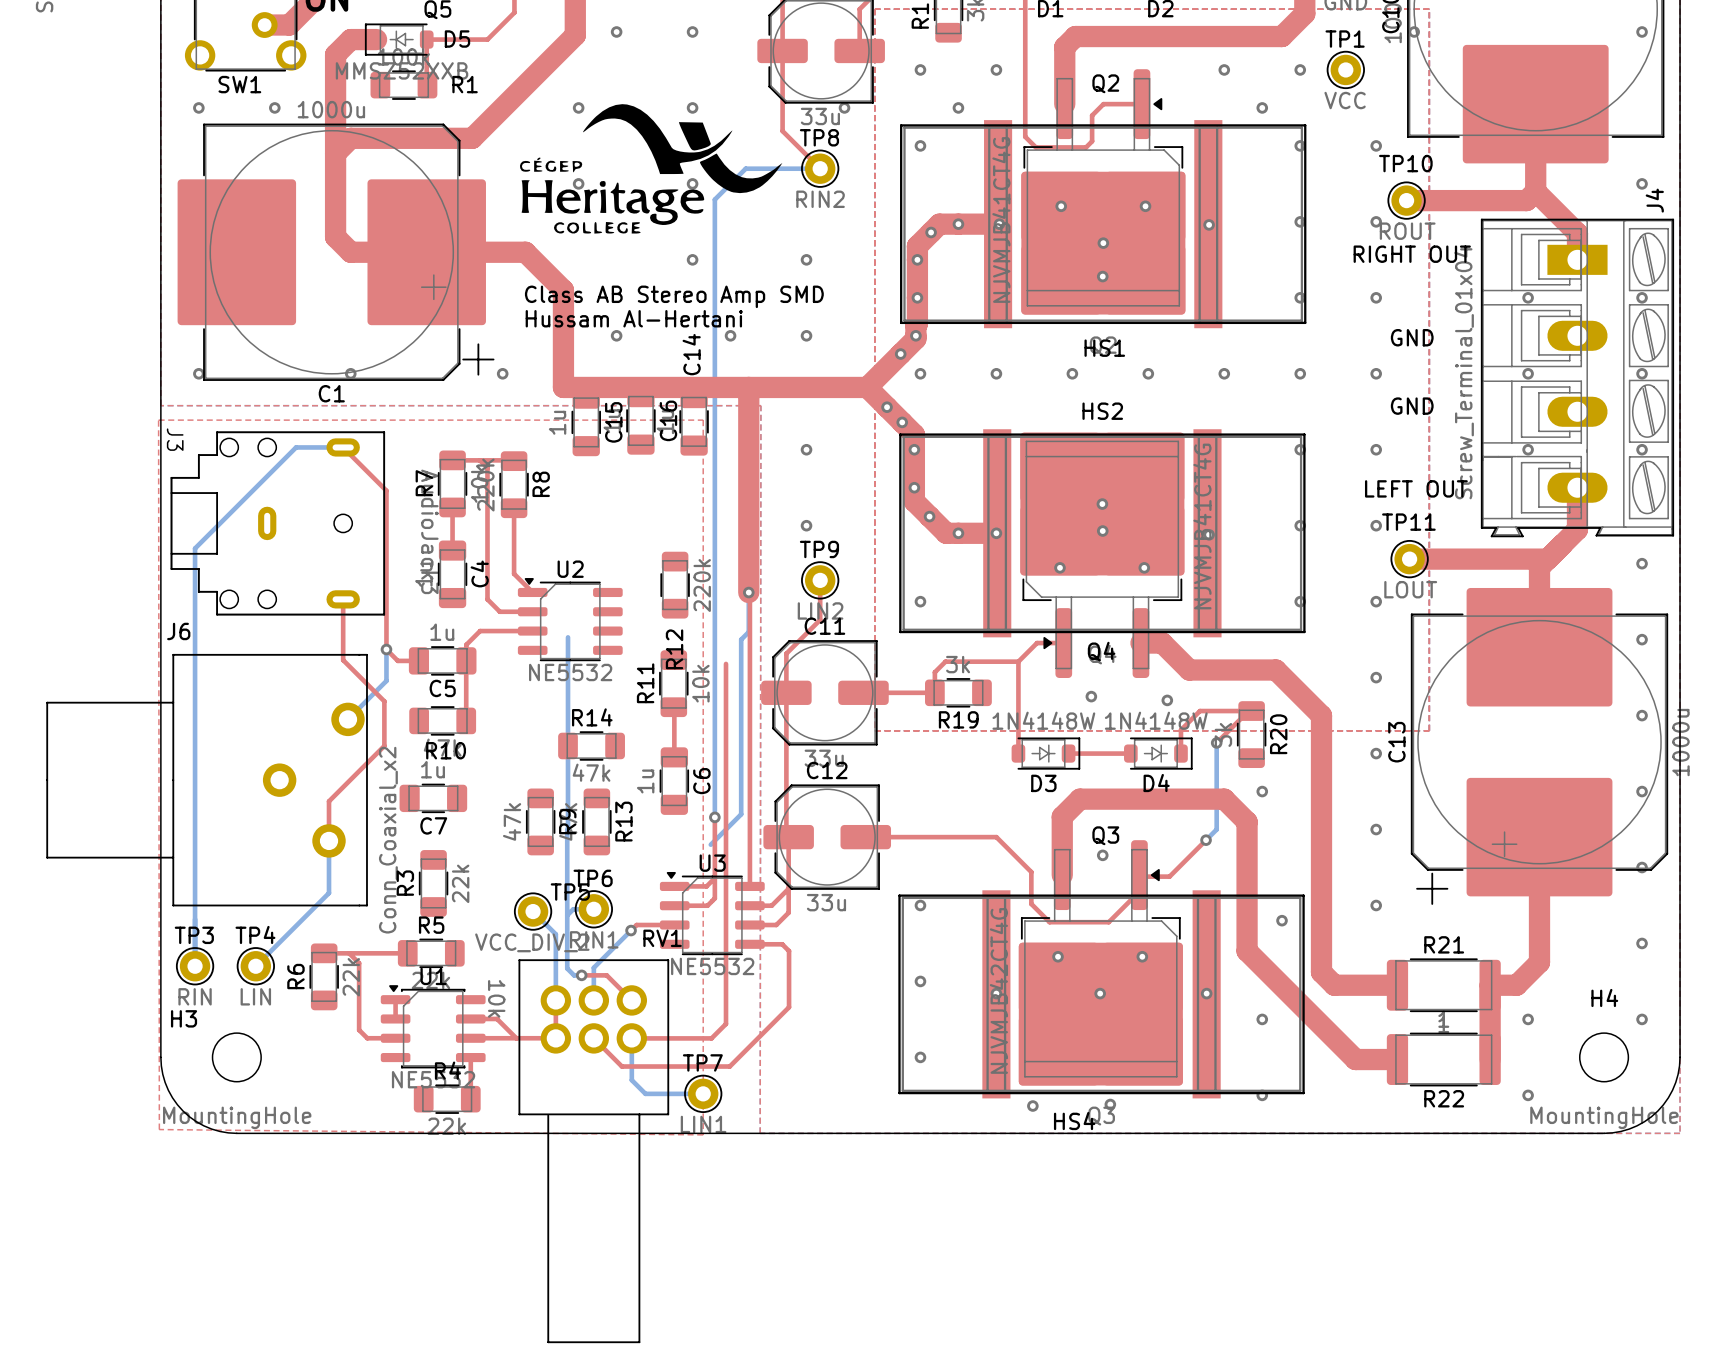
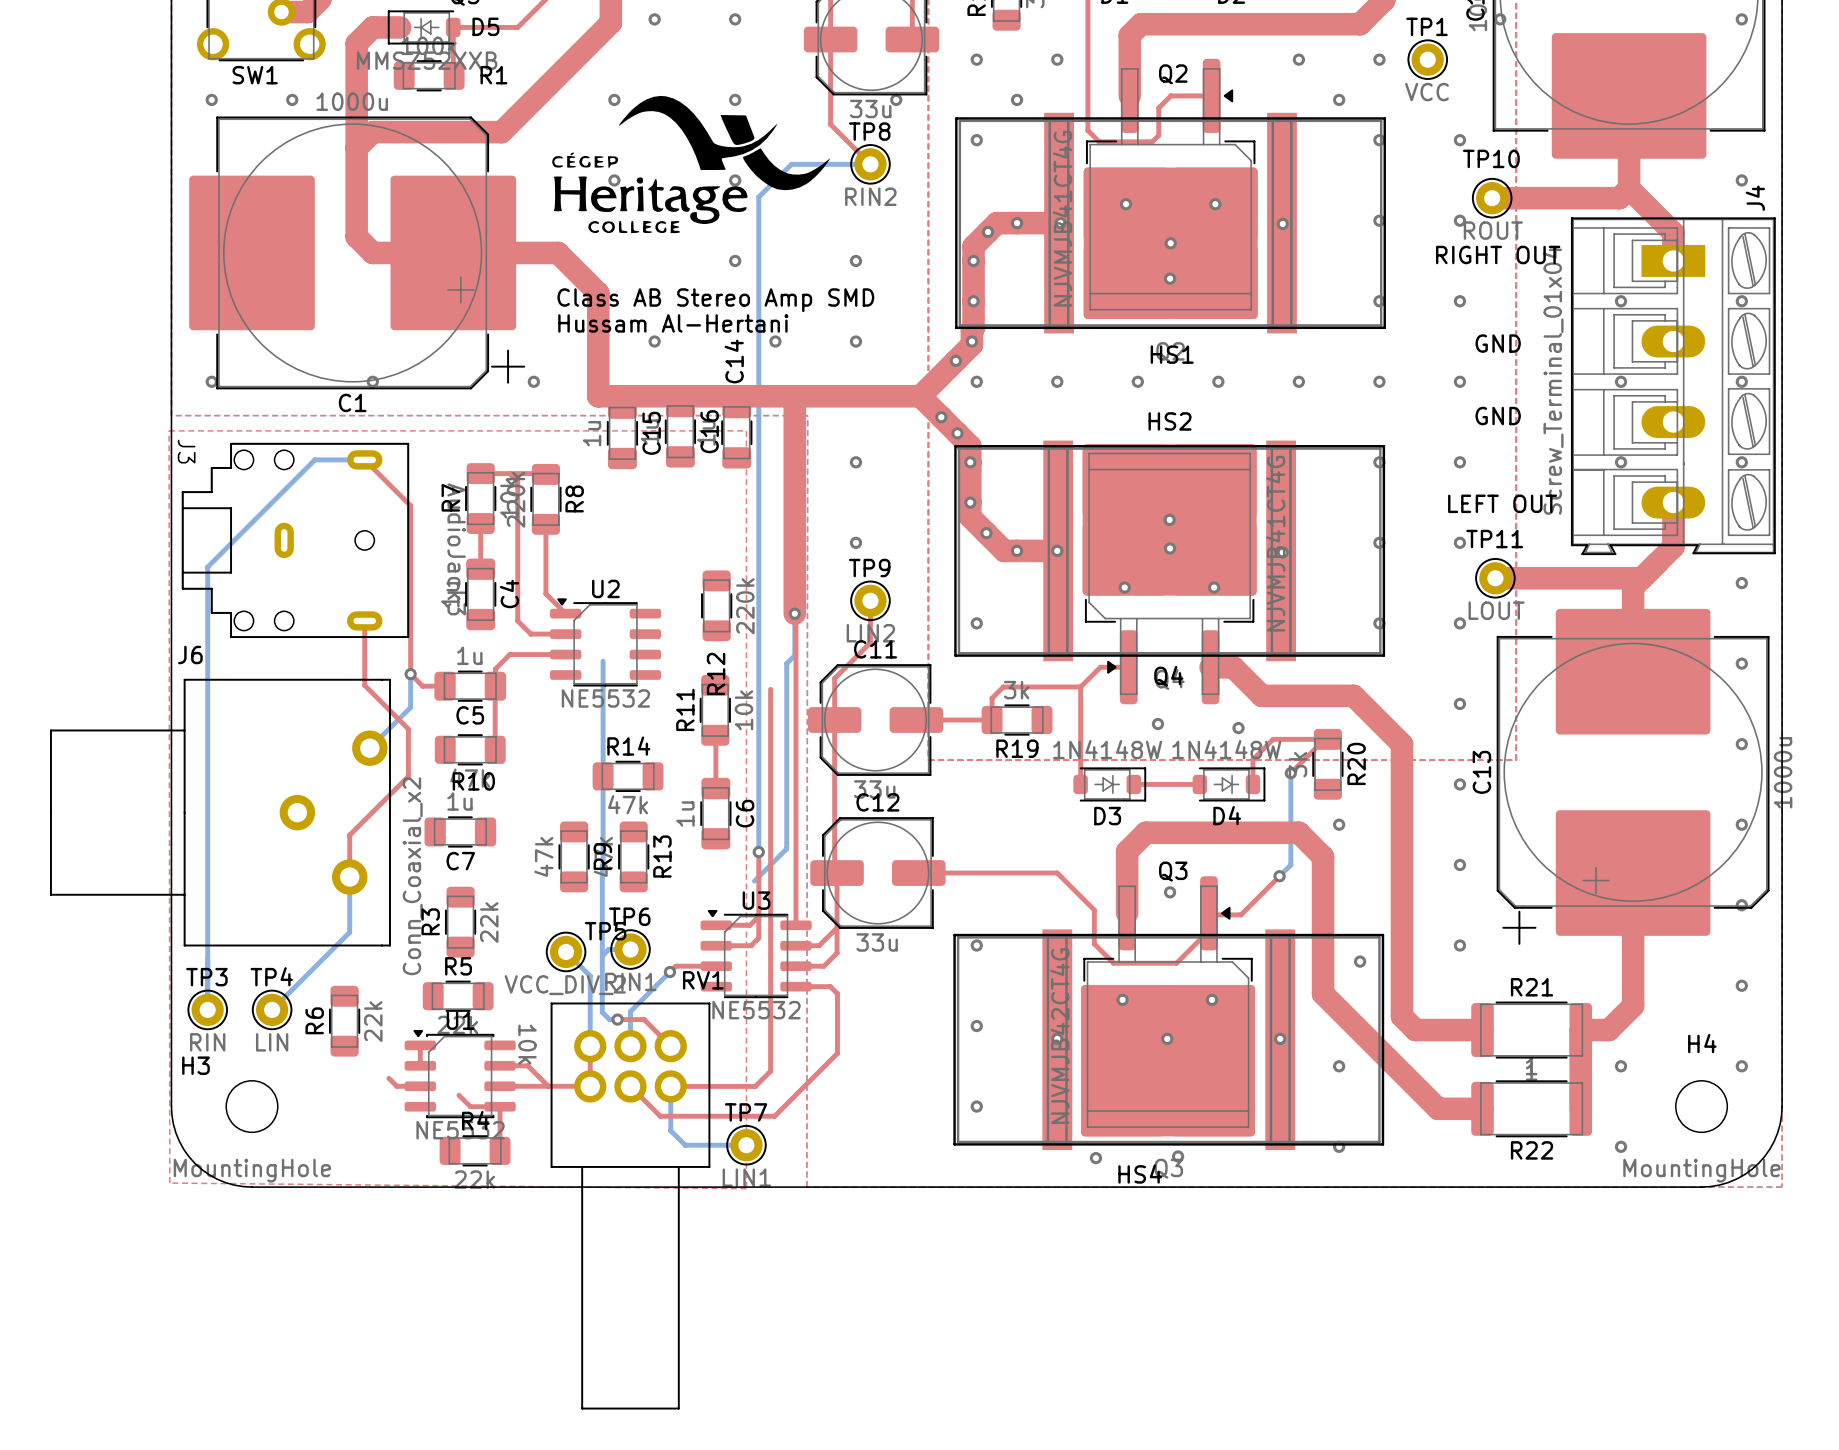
top track: (324, 953) (407, 953) -> none
top track: (349, 953) (359, 963) (359, 1030) (367, 1038) (373, 1038) -> (388, 1078) (396, 1086)
top track: none -> (458, 1095) (470, 1106) (500, 1106)

